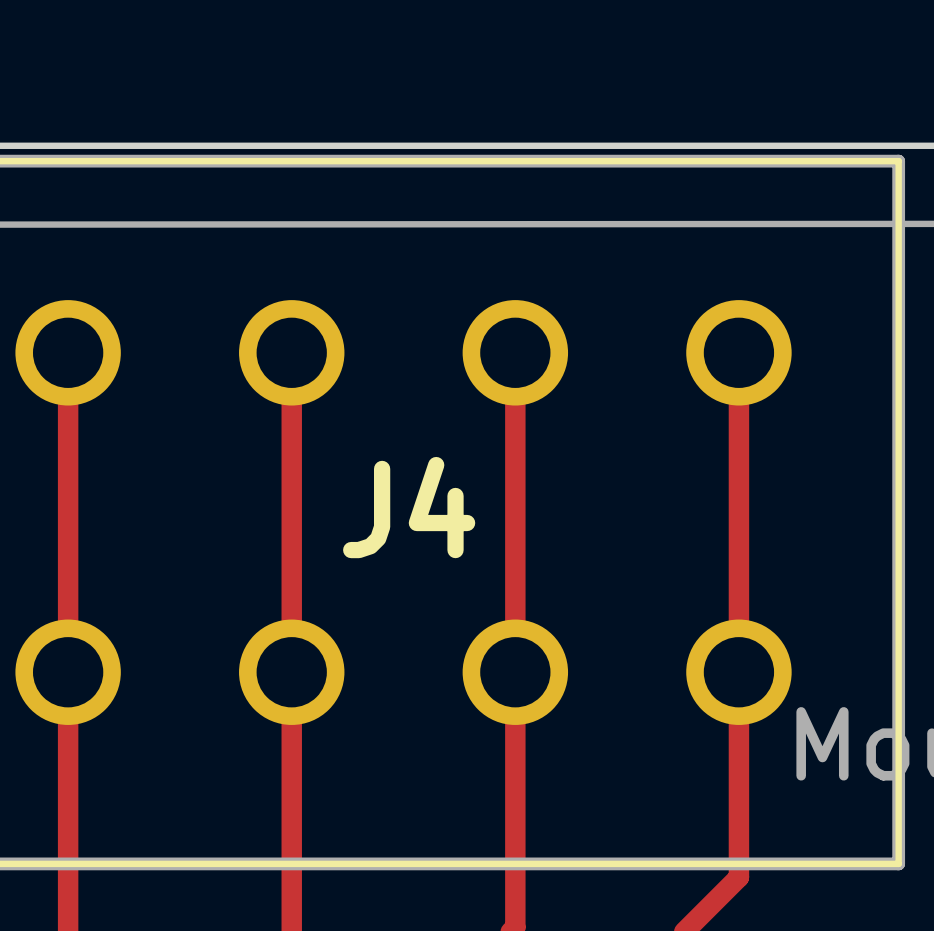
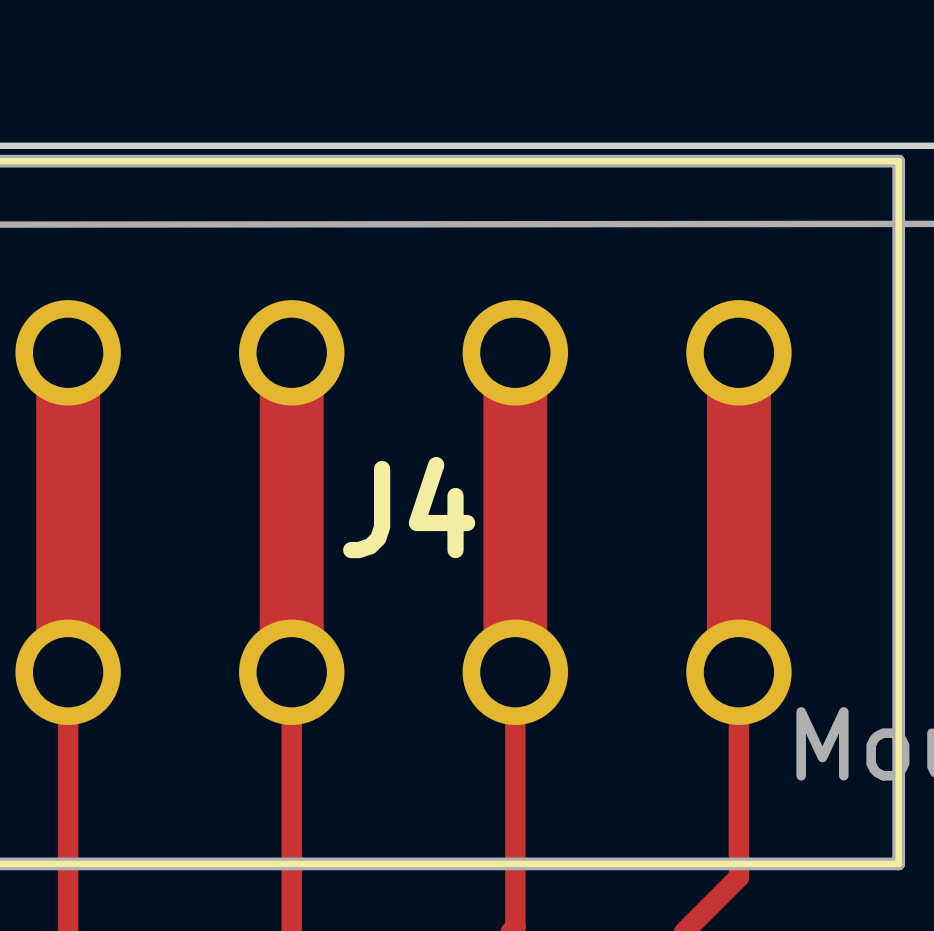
track width: thin (68, 352) (68, 672) -> thick (68, 352) (68, 672)
track width: thin (291, 352) (291, 672) -> thick (291, 352) (291, 672)
track width: thin (515, 352) (515, 672) -> thick (515, 352) (515, 672)
track width: thin (738, 352) (738, 672) -> thick (738, 352) (738, 672)

